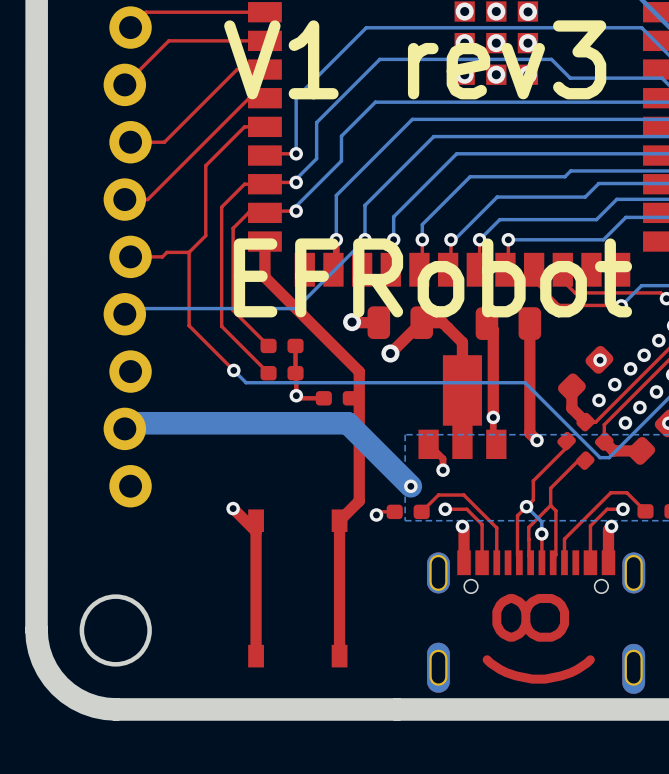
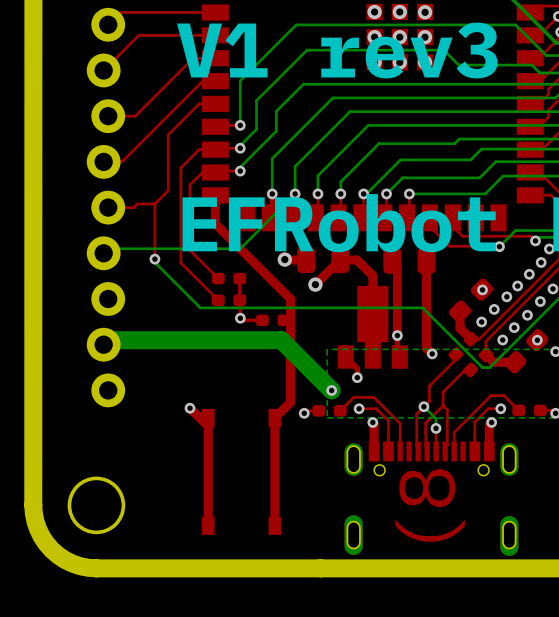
top track: (189, 321) (189, 325) (233, 370) -> none
bottom track: none -> (154, 259) (154, 262) (190, 298)
via position: (233, 370) -> (154, 259)

